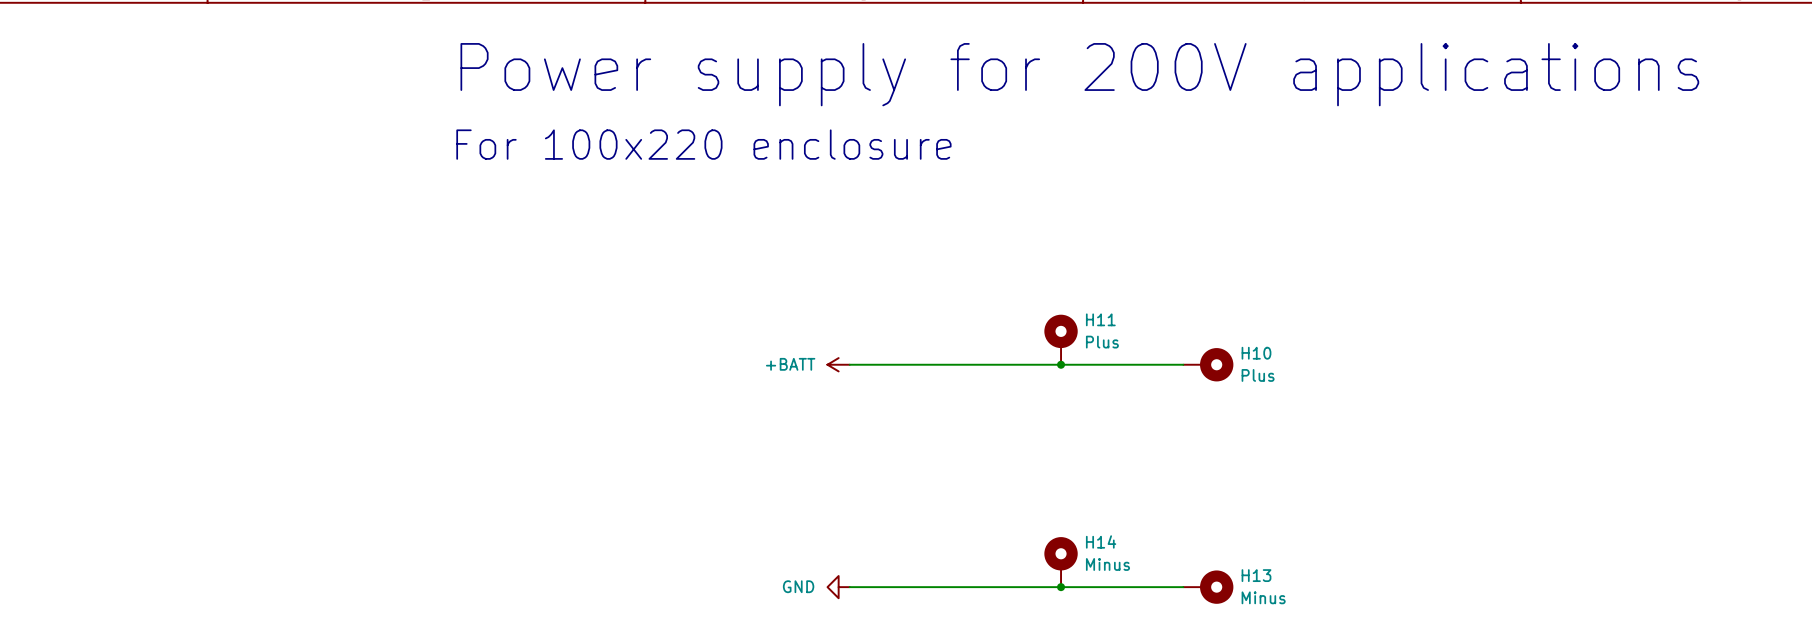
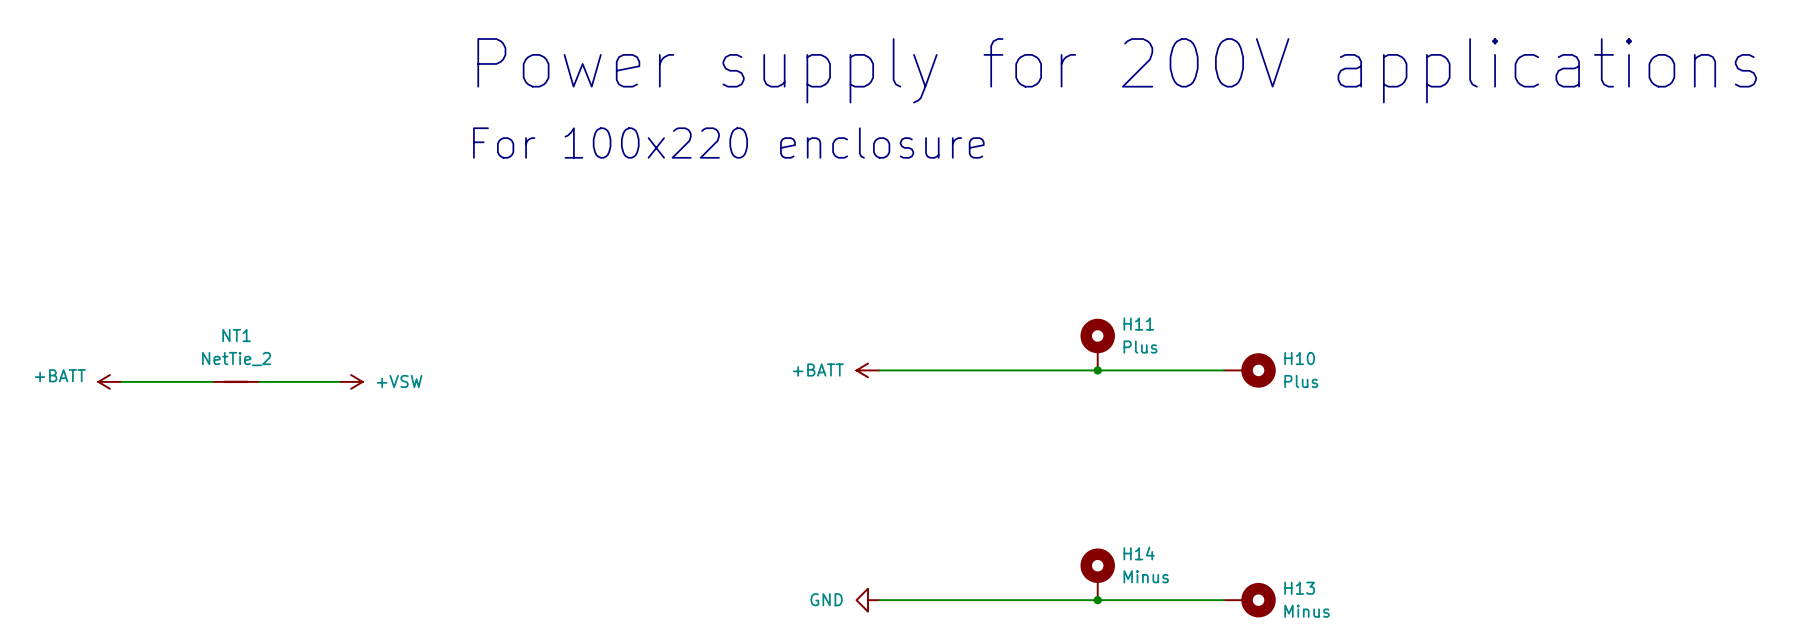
power symbol: none -> +BATT (109, 381)
wire: none -> (121, 381) (213, 381)
NT1: none -> NetTie_2 (236, 381)
wire: none -> (259, 381) (339, 381)
power symbol: none -> +VSW (351, 381)

